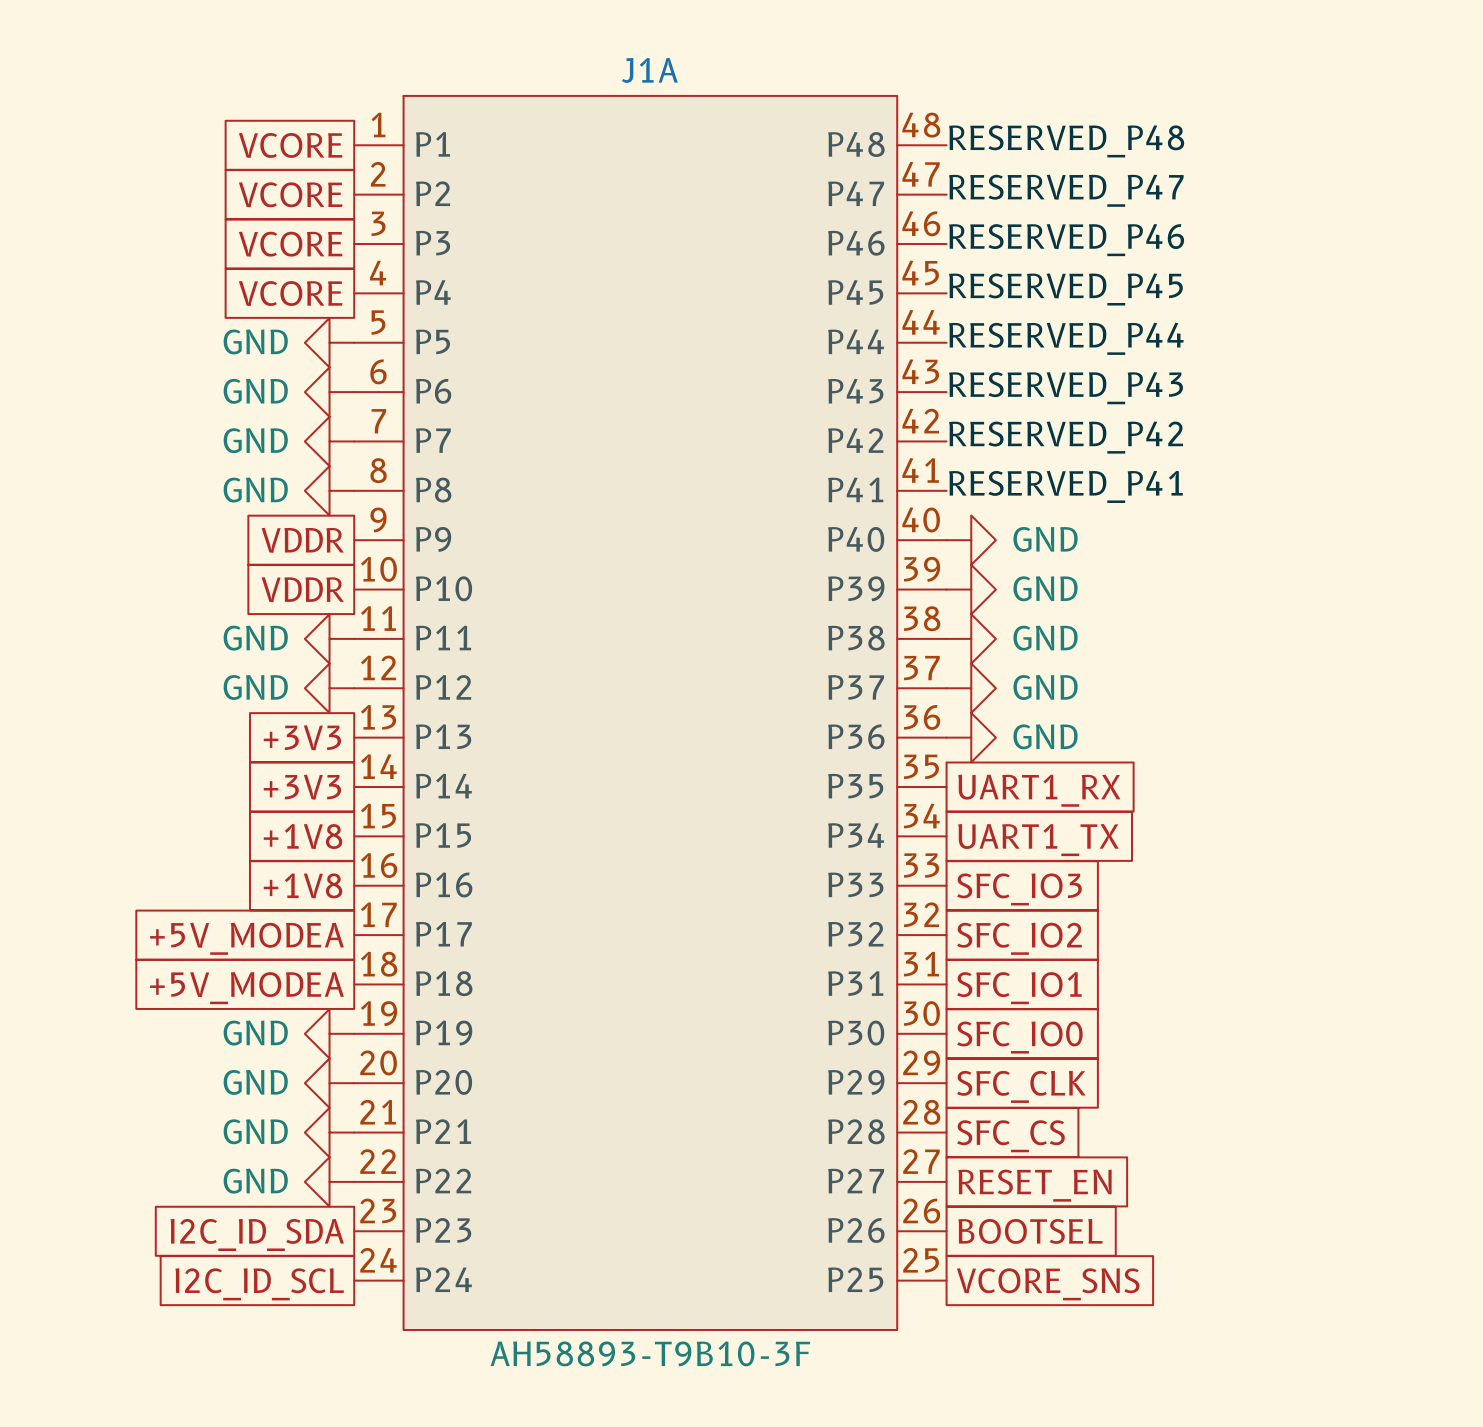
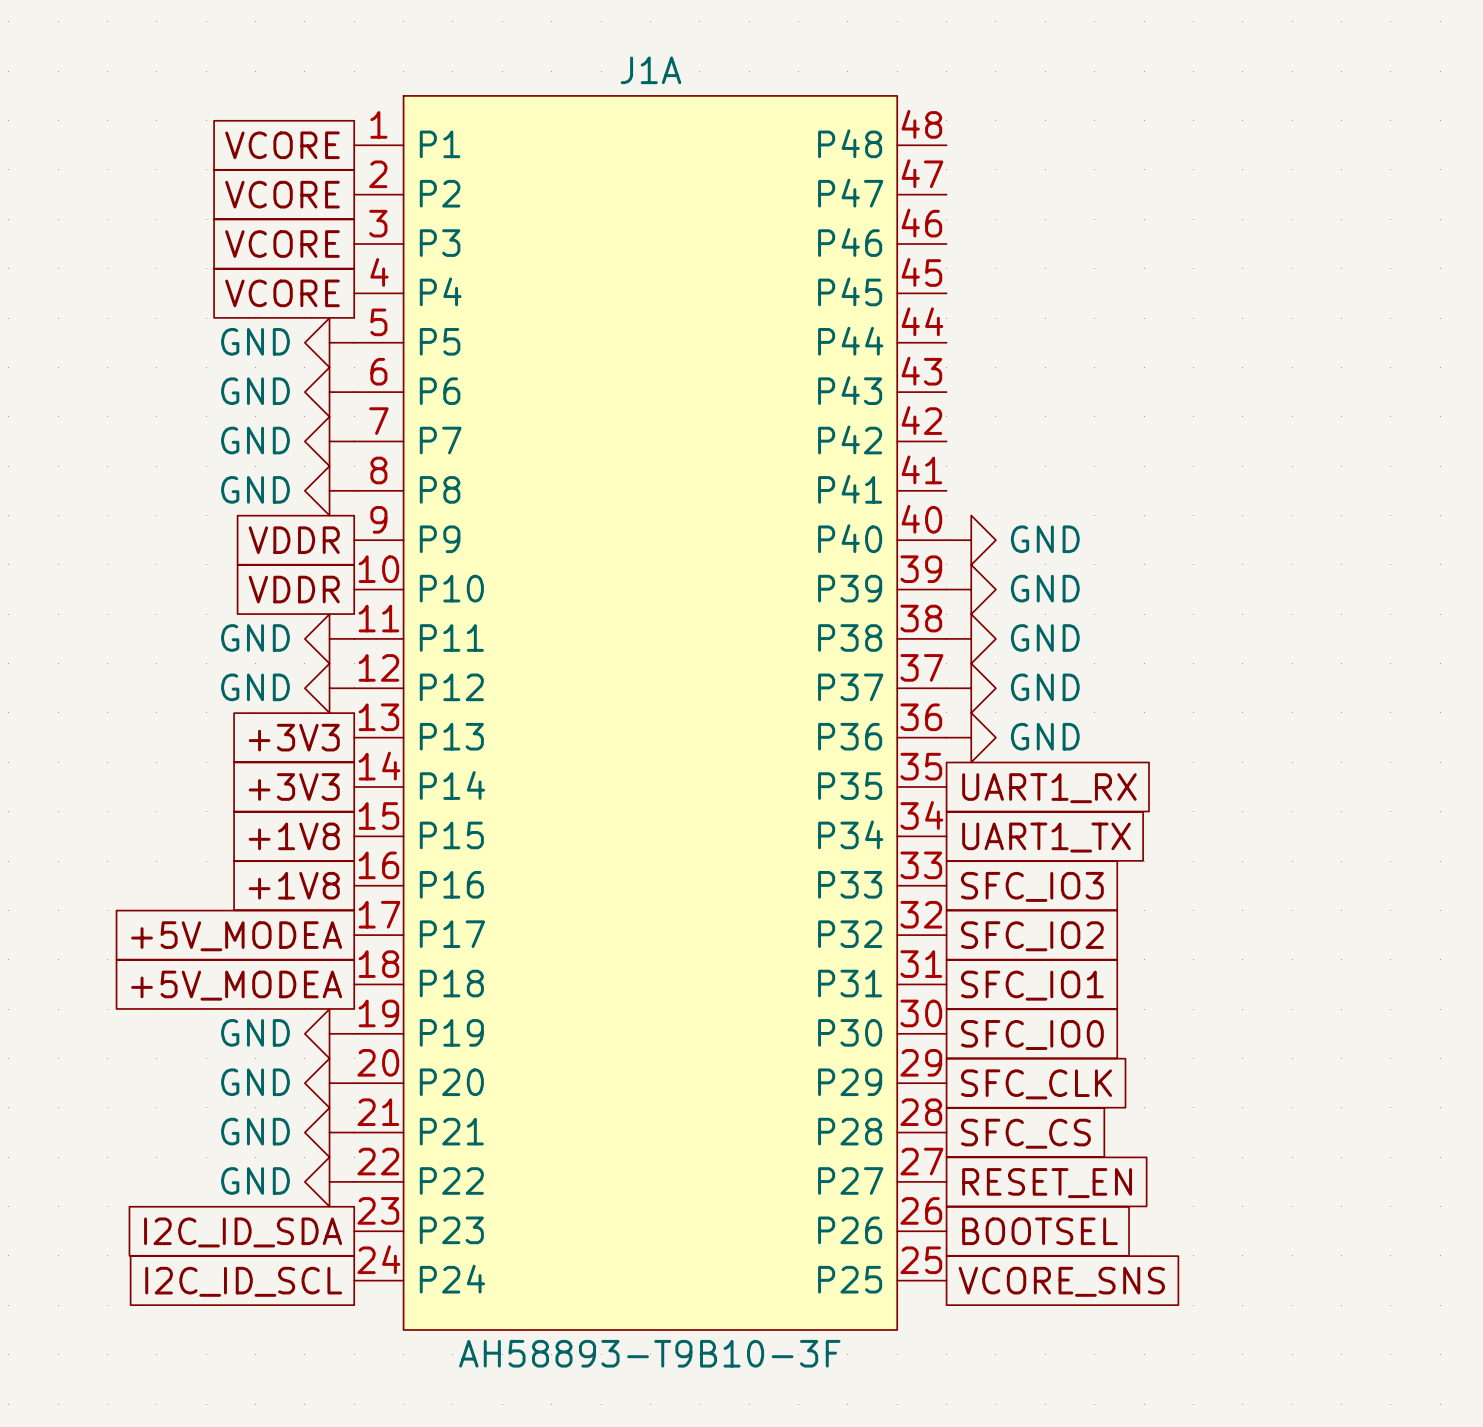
label: RESERVED_P48 (1066, 141) -> none
label: RESERVED_P47 (1066, 190) -> none
label: RESERVED_P46 (1066, 240) -> none
label: RESERVED_P45 (1065, 289) -> none
label: RESERVED_P44 (1066, 338) -> none
label: RESERVED_P43 (1066, 388) -> none
label: RESERVED_P42 (1066, 437) -> none
label: RESERVED_P41 (1065, 486) -> none

